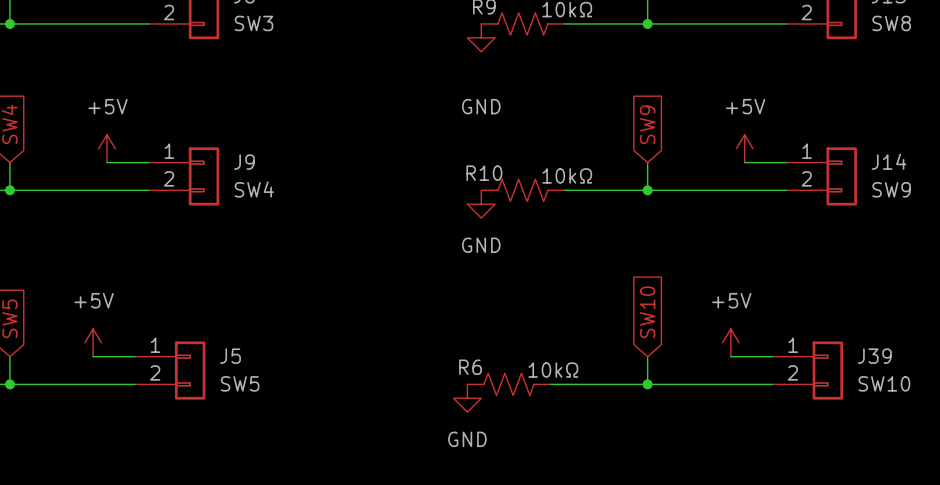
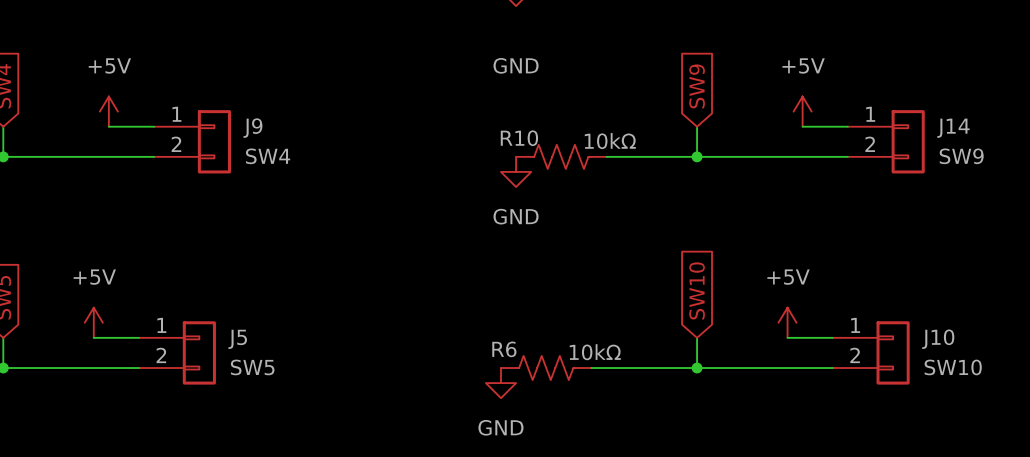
J39 name: J39 (874, 356) -> J10 (938, 339)

